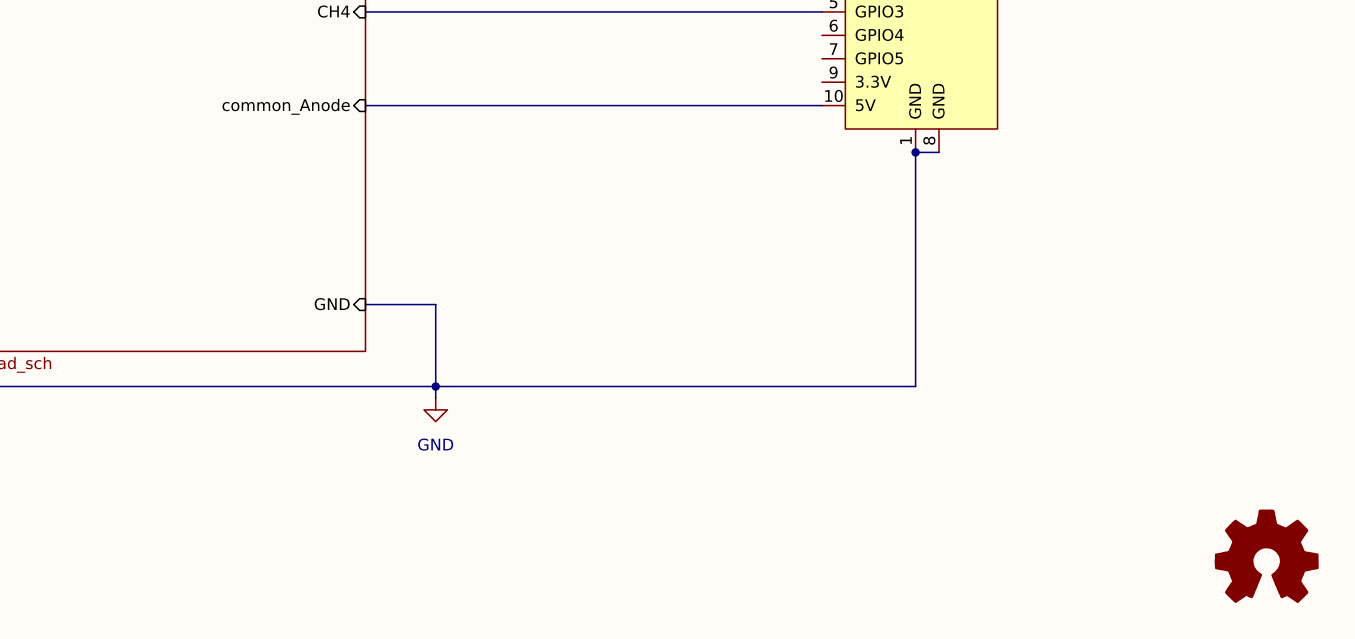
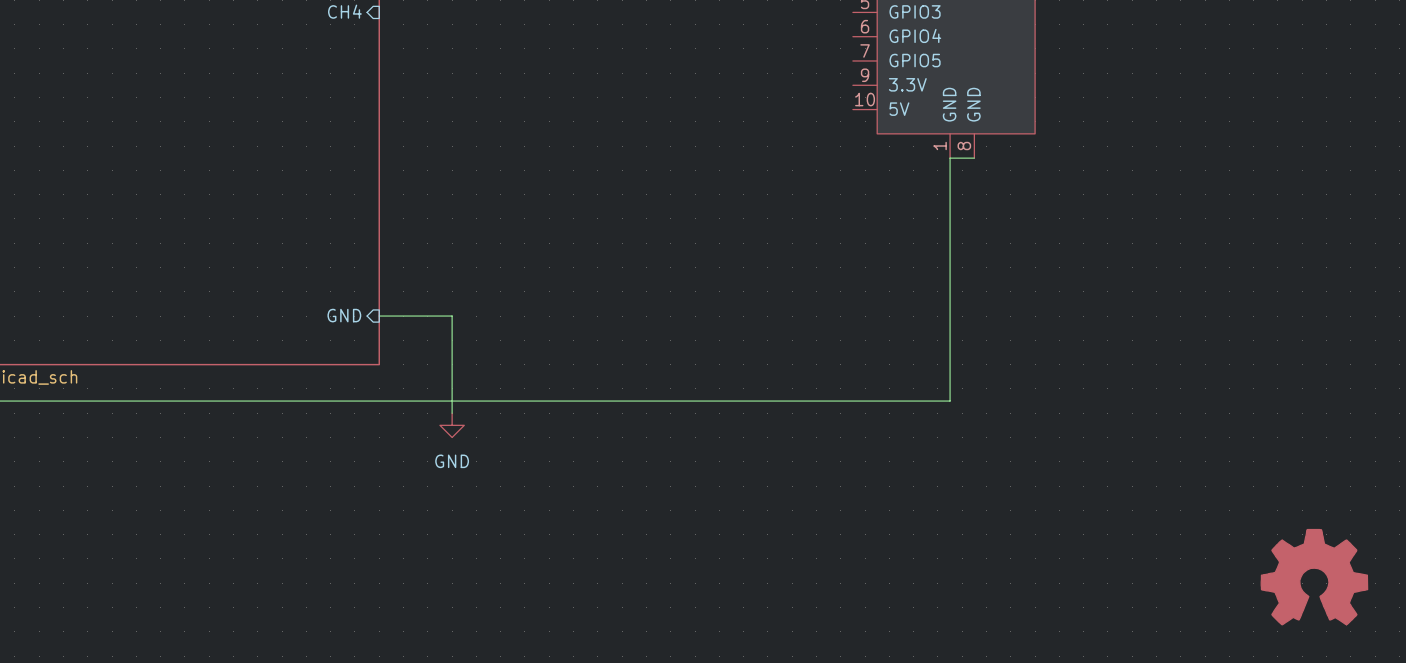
wire: (365, 11) (821, 11) -> none
wire: (365, 105) (821, 105) -> none
sheet pin: common_Anode (286, 106) -> none
junction: (915, 152) -> none
junction: (435, 386) -> none

